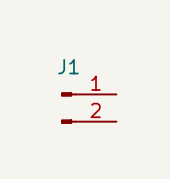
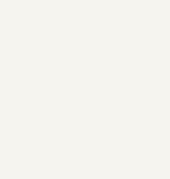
J1: (88, 108) -> none

